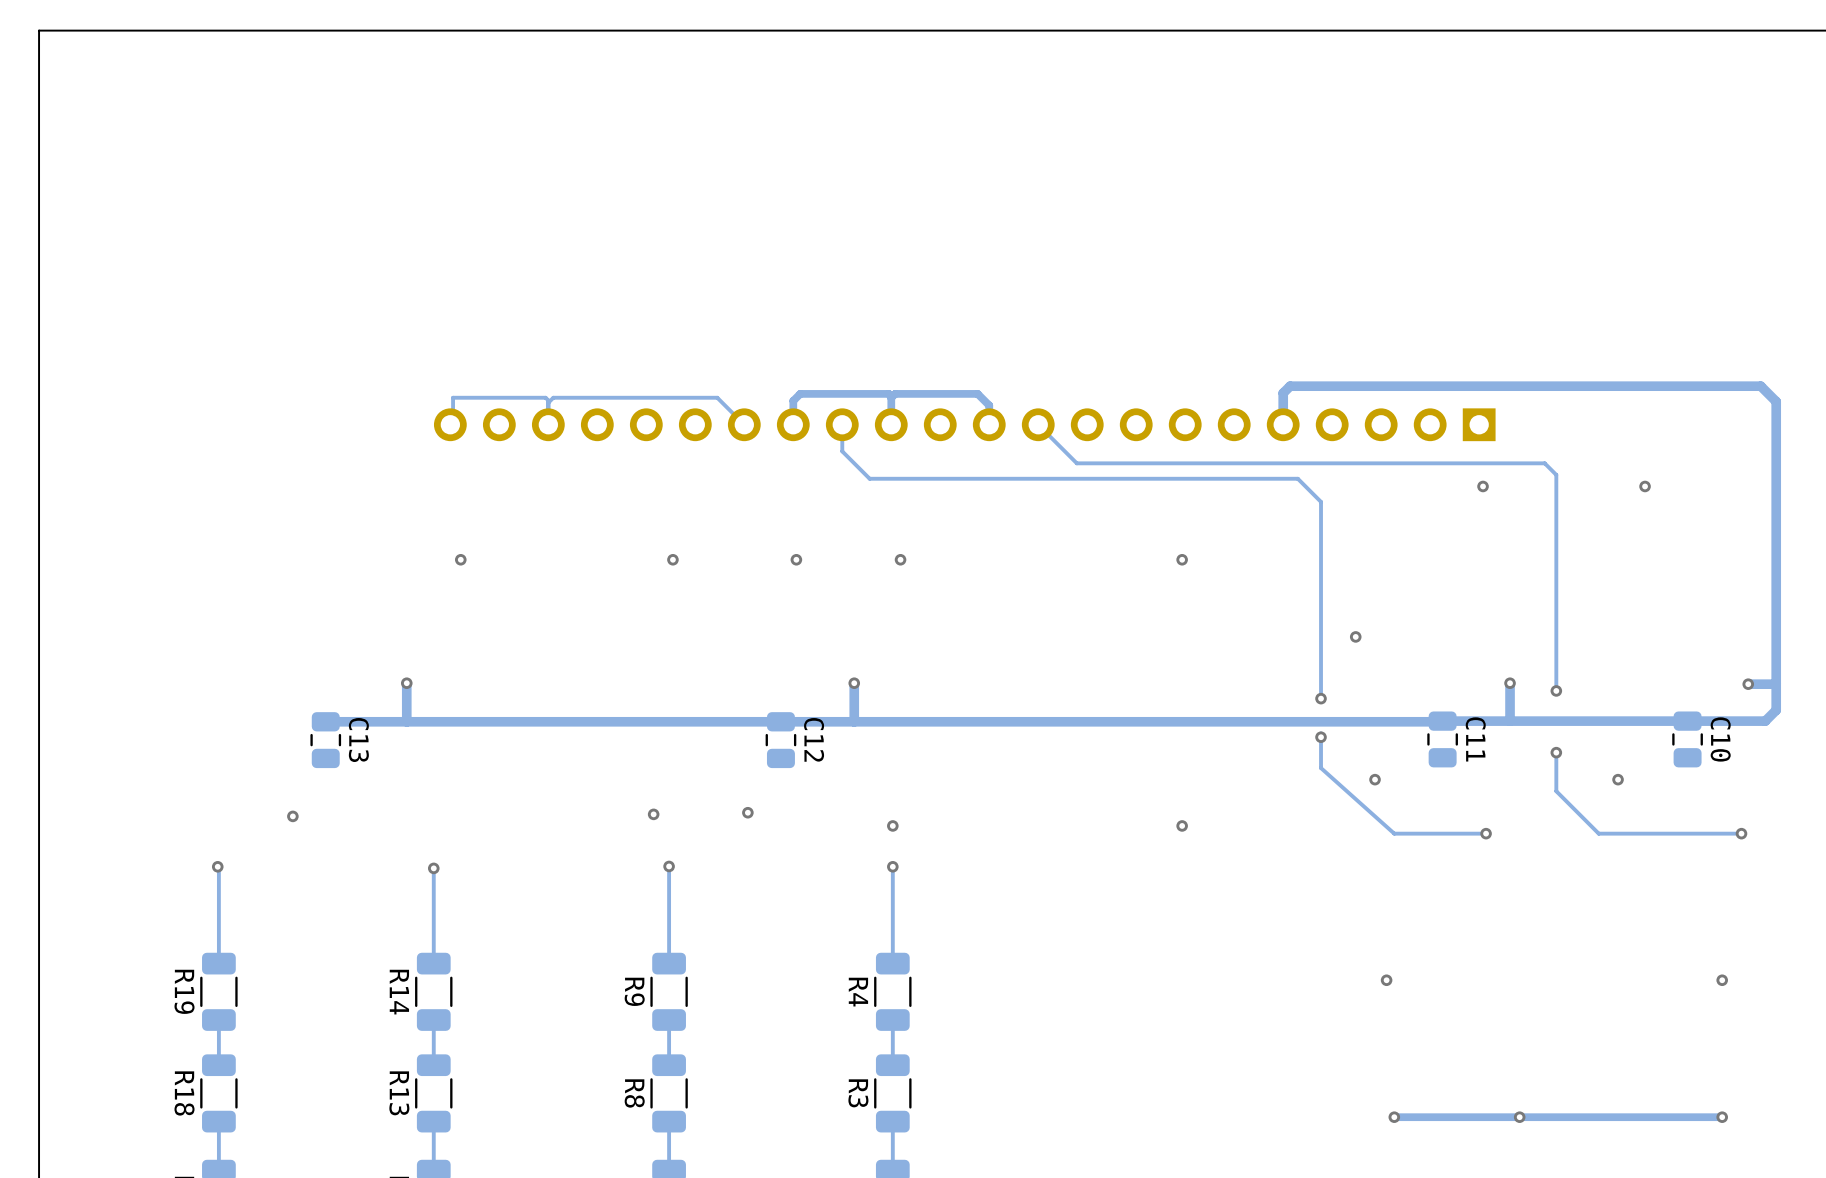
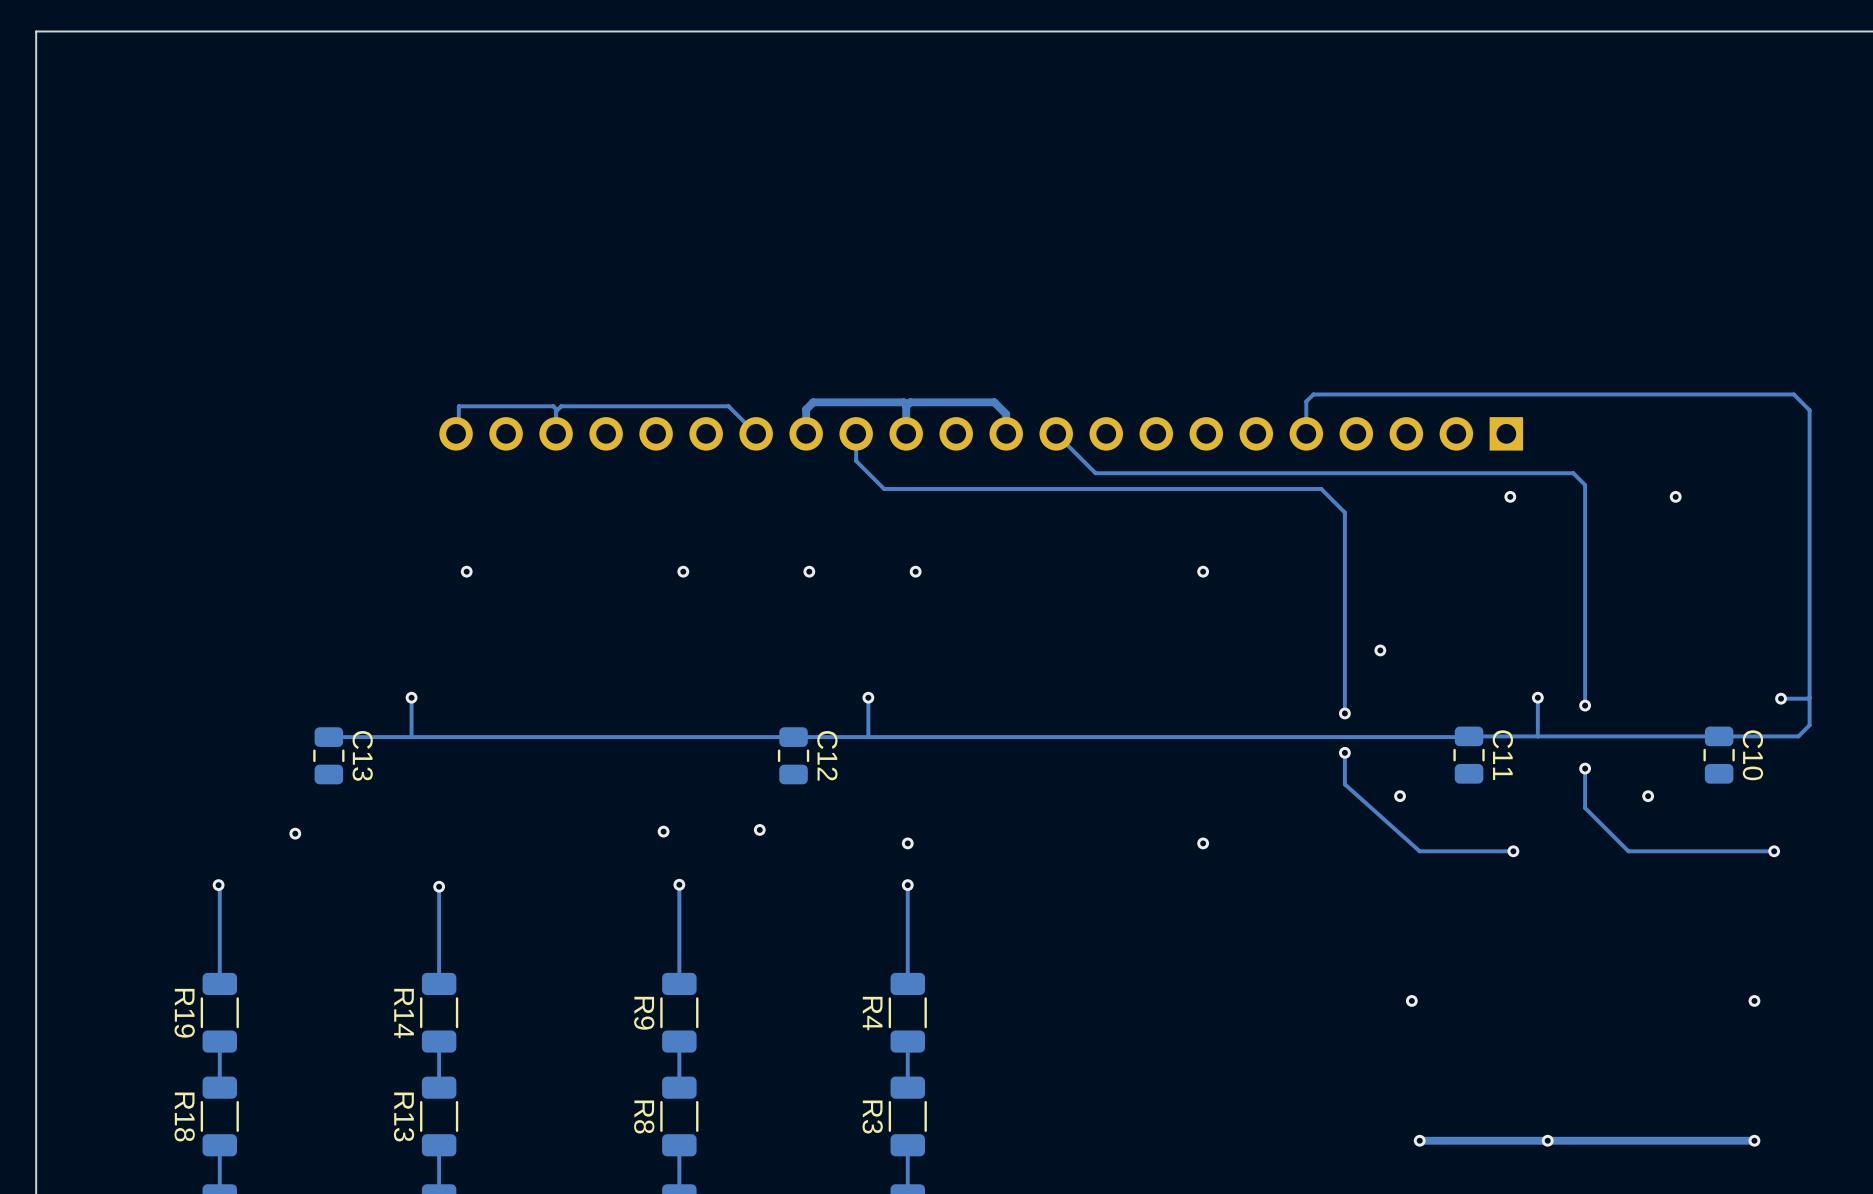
track width: thick (1283, 424) (1283, 393) (1290, 386) (1760, 386) (1776, 401) (1776, 710) (1765, 721) (325, 721) -> thin (1306, 433) (1306, 401) (1313, 394) (1793, 394) (1809, 410) (1809, 725) (1798, 736) (328, 737)
track width: thick (406, 683) (406, 721) -> thin (411, 697) (411, 737)
track width: thick (854, 683) (854, 721) -> thin (868, 697) (868, 737)
track width: thick (1510, 683) (1510, 721) -> thin (1537, 697) (1537, 736)
track width: thick (1776, 683) (1748, 684) -> thin (1809, 697) (1781, 698)

